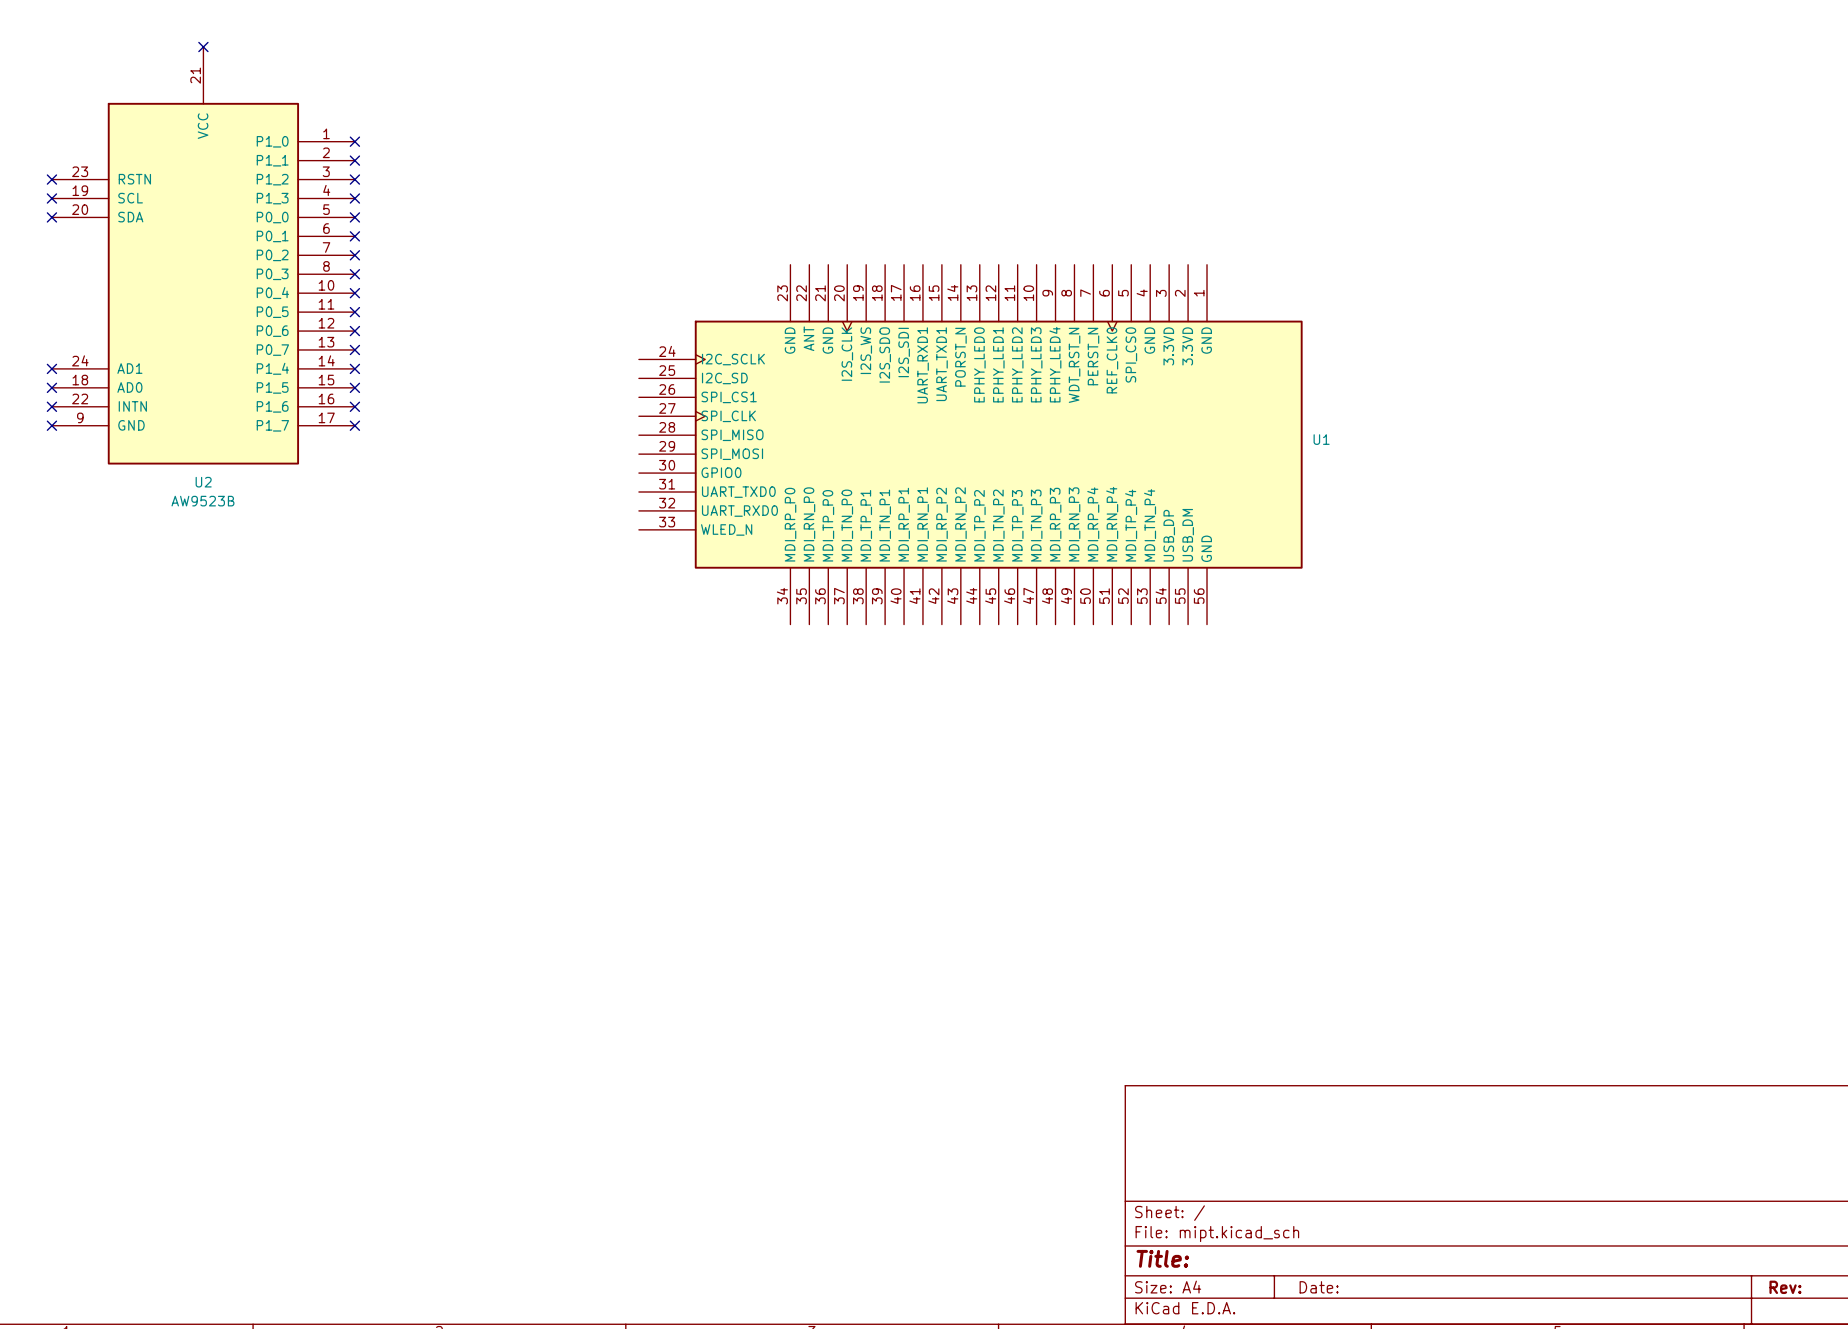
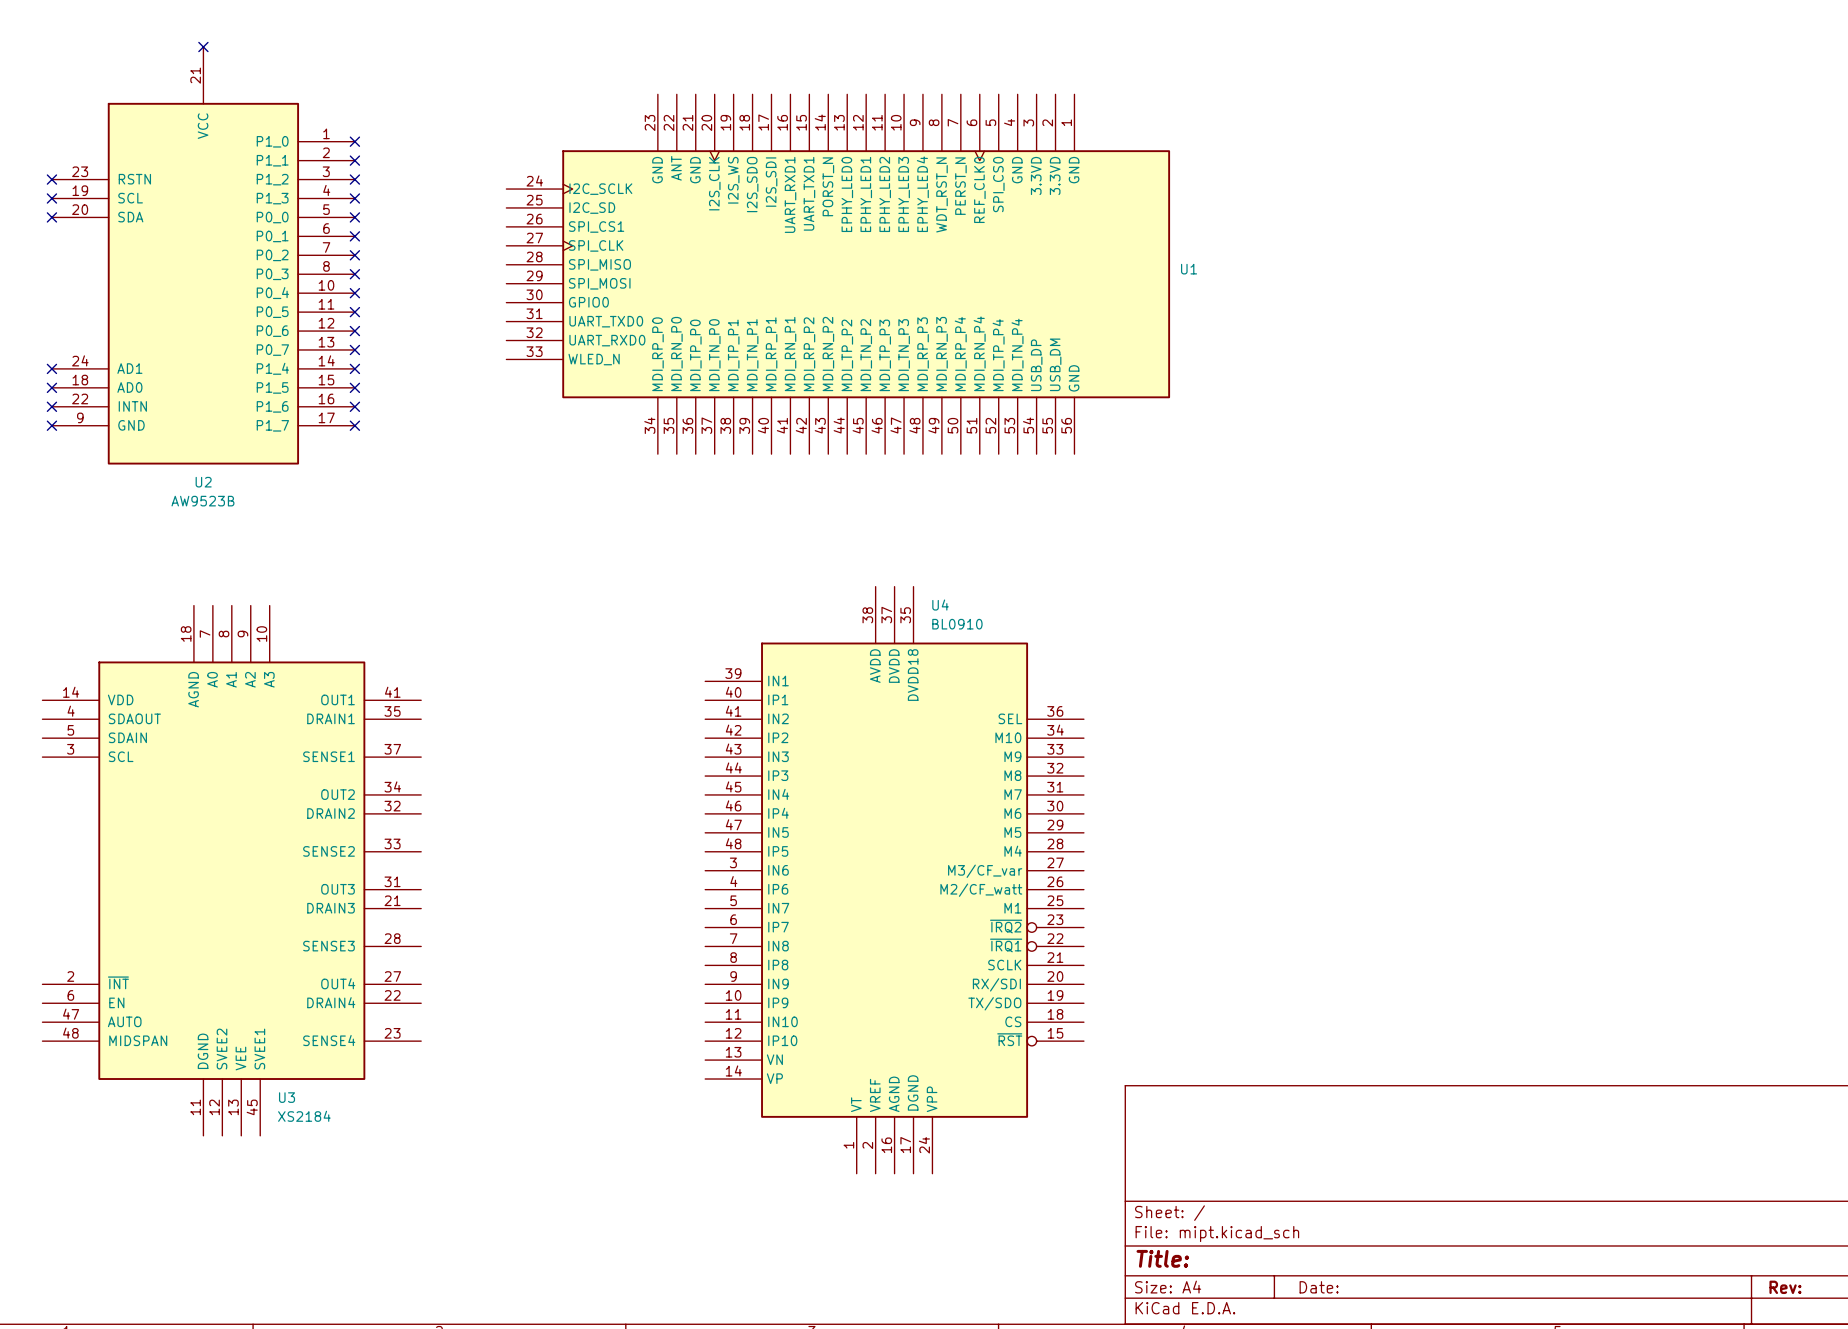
U1 position: (970, 444) -> (838, 274)
U3: none -> XS2184 (231, 870)
U4: none -> BL0910 (894, 880)

